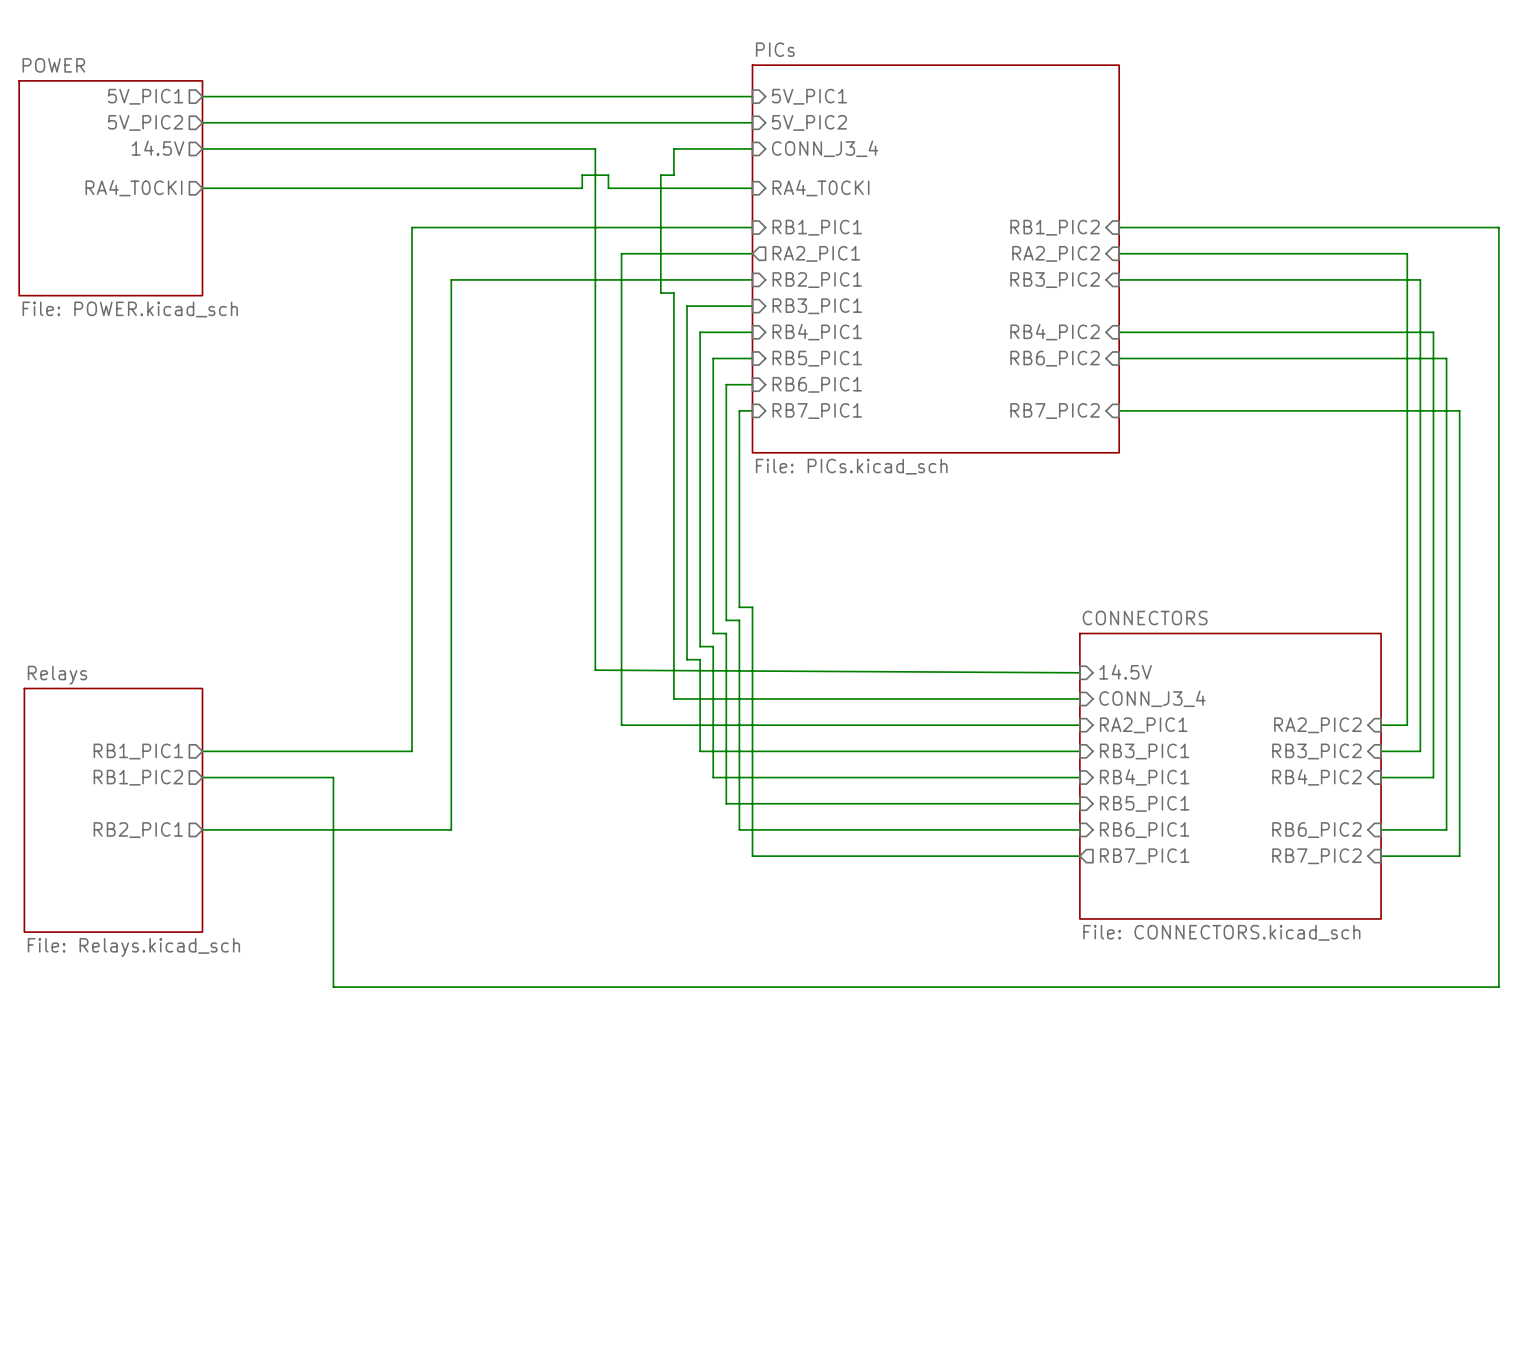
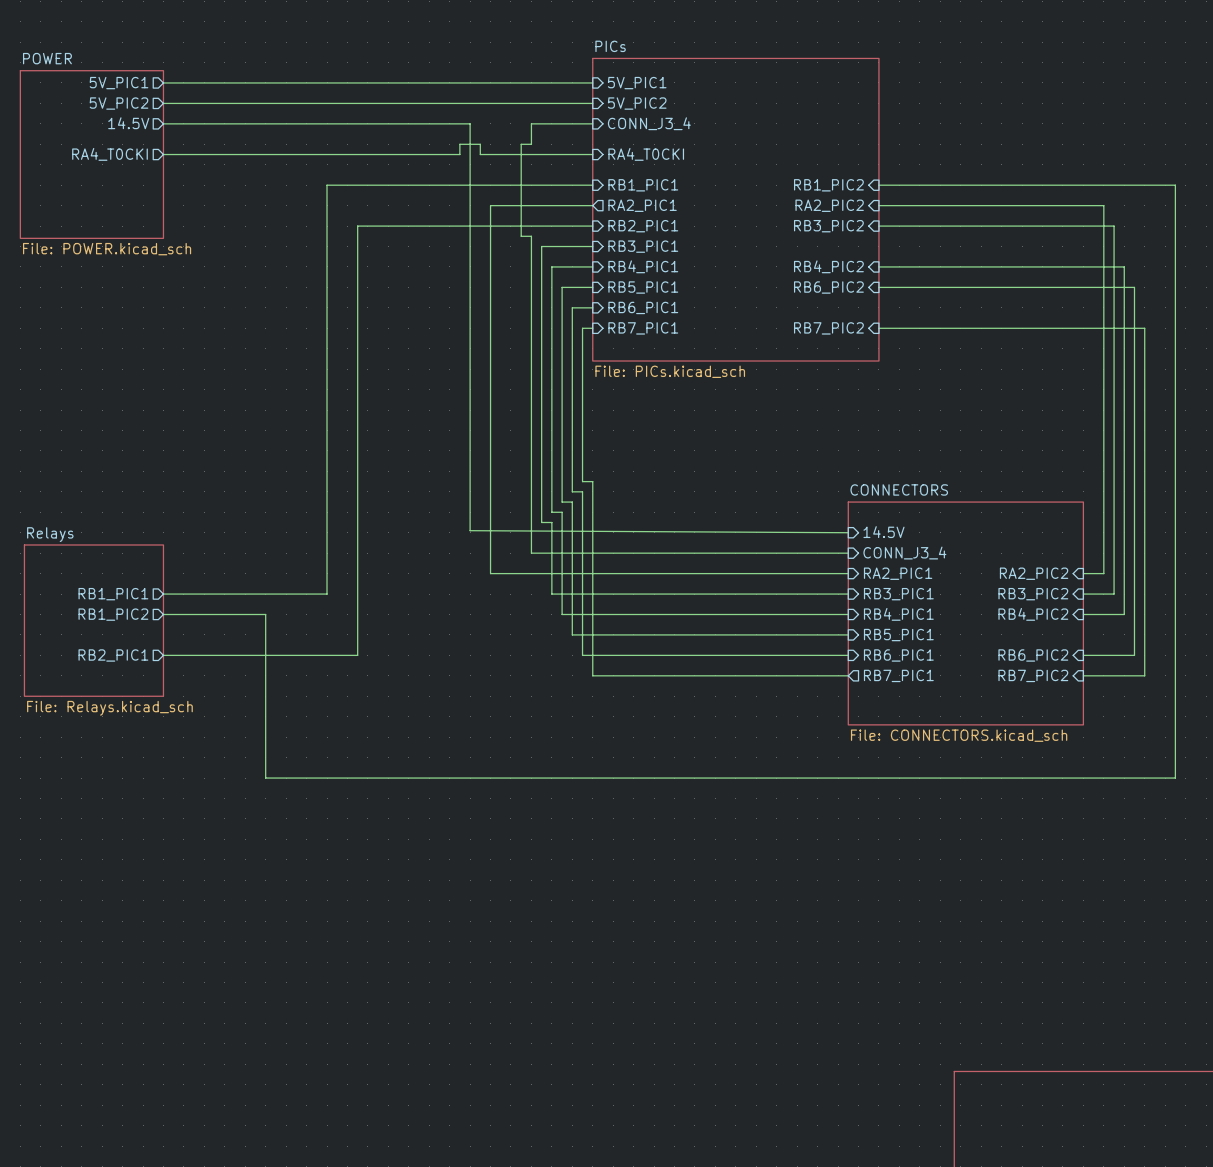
sheet Relays: none -> File: Relays.kicad_sch (93, 620)
sheet Relays: File: Relays.kicad_sch (113, 810) -> none

